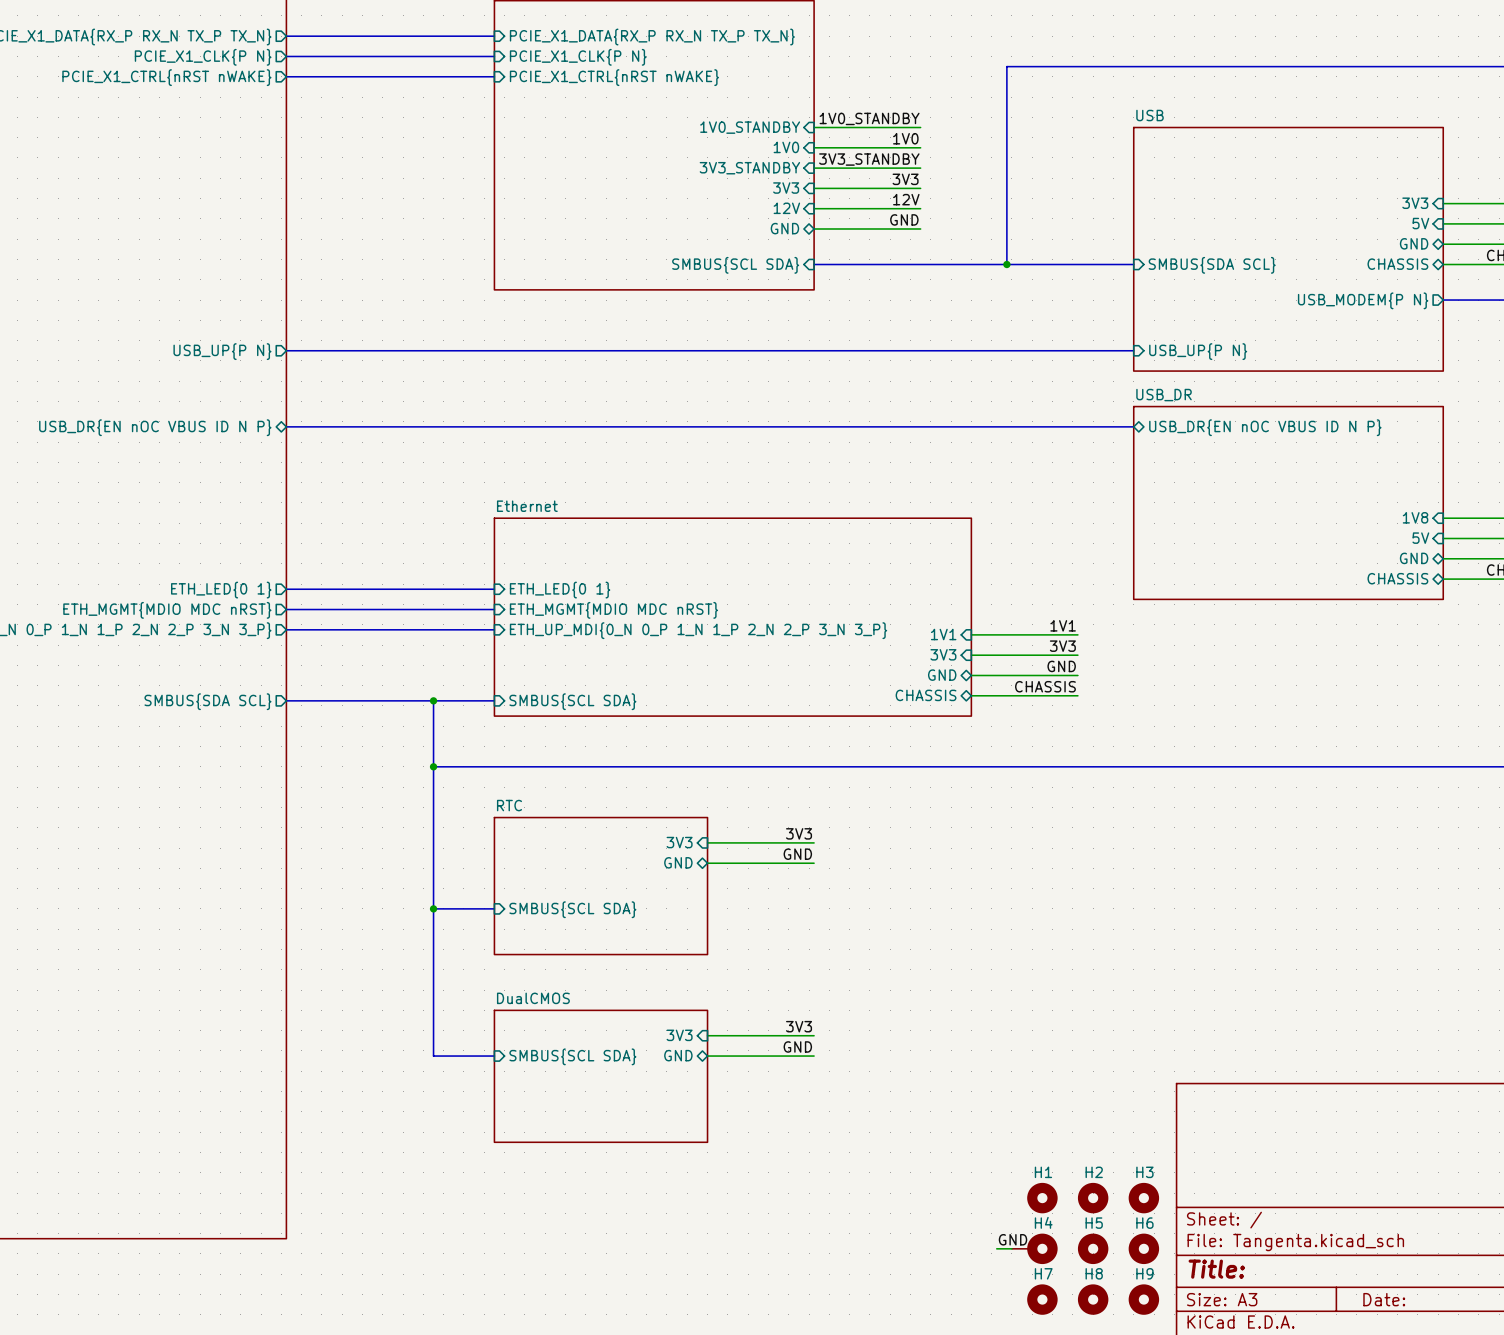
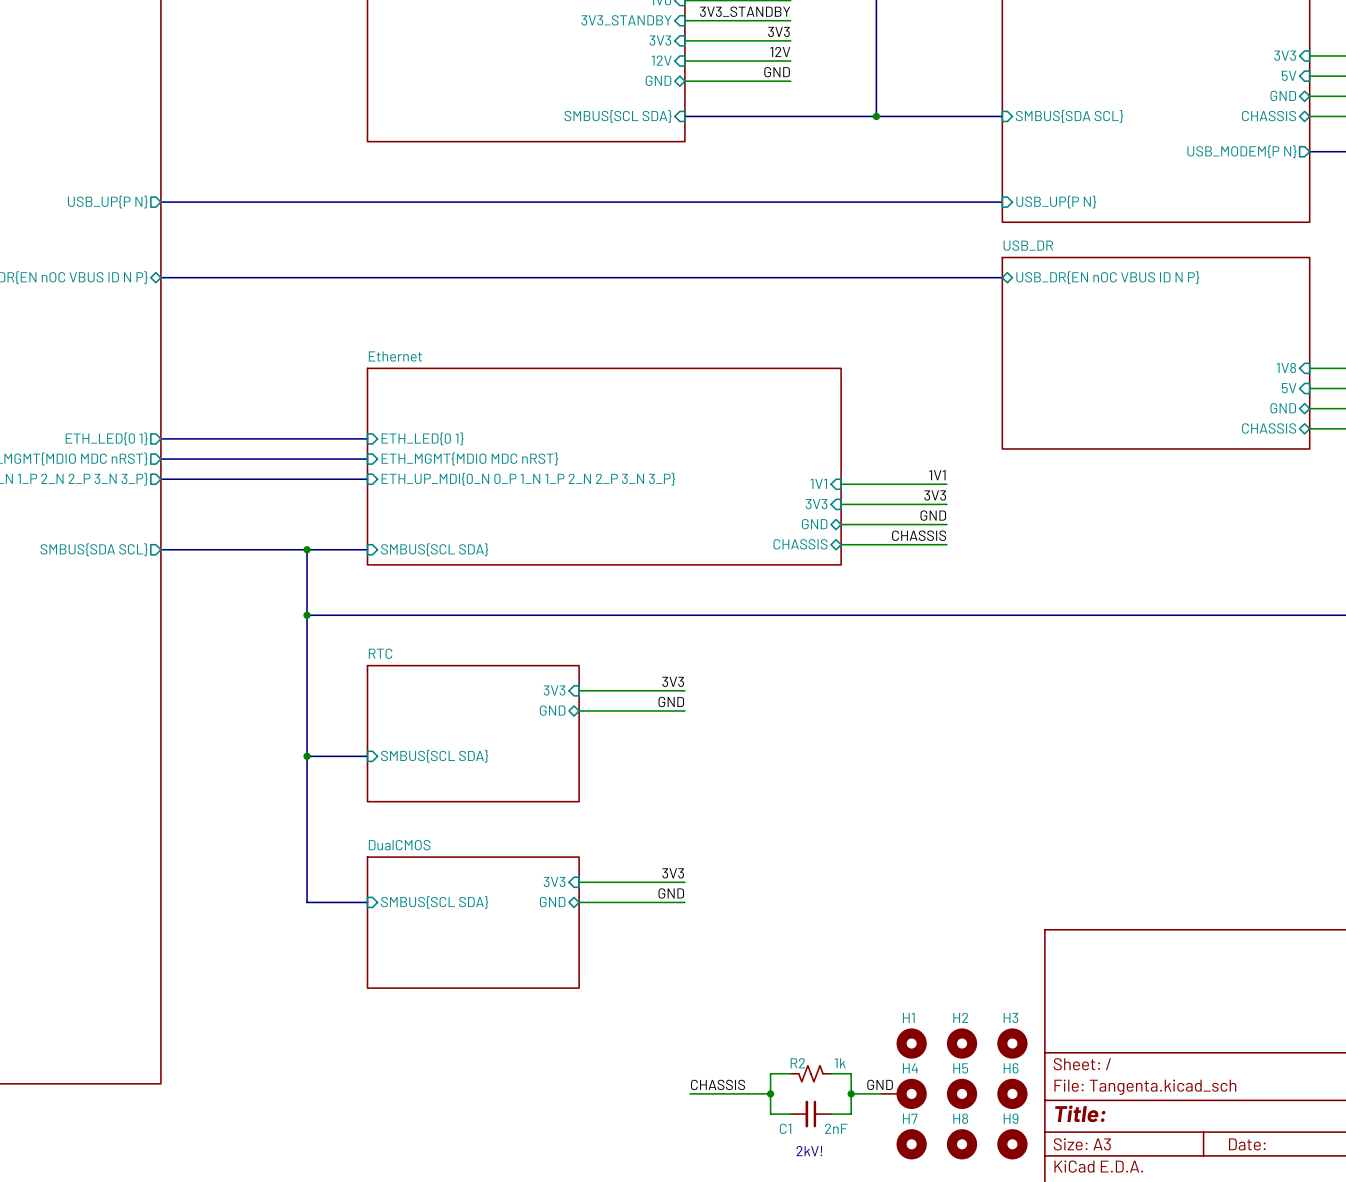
wire: none -> (790, 1073) (770, 1073) (770, 1114) (790, 1114)
R2: none -> 1k (810, 1073)
wire: none -> (831, 1073) (851, 1073) (851, 1114) (831, 1114)
label: none -> CHASSIS (718, 1084)
wire: none -> (689, 1093) (770, 1093)
junction: none -> (770, 1093)
wire: none -> (851, 1093) (866, 1093)
junction: none -> (851, 1093)
C1: none -> 2nF (810, 1114)
text: none -> 2kV! (809, 1151)

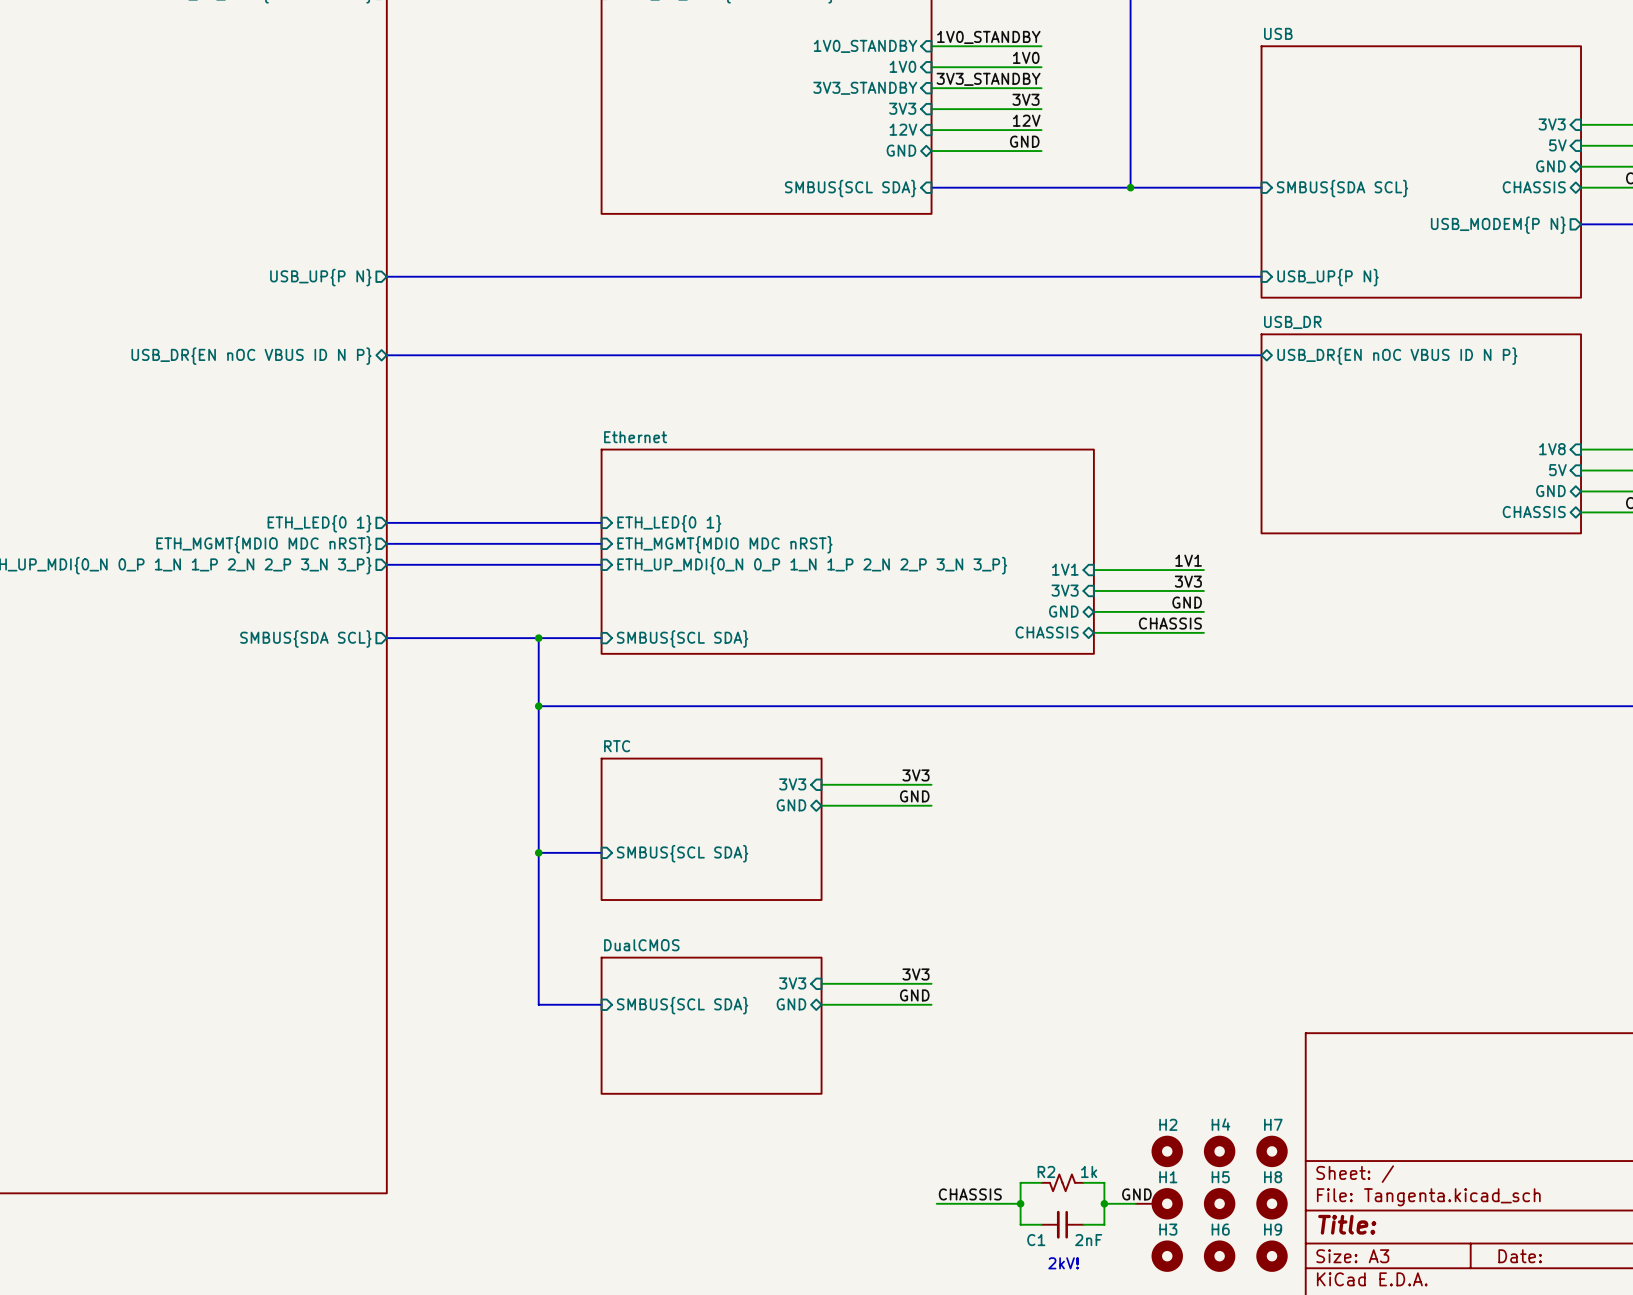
H1 name: H1 (908, 1017) -> H2 (1168, 1124)
H2 name: H2 (960, 1017) -> H4 (1220, 1124)
H3 name: H3 (1010, 1018) -> H7 (1273, 1124)
H4 name: H4 (910, 1068) -> H1 (1168, 1177)
H6 name: H6 (1011, 1068) -> H8 (1273, 1177)
H7 name: H7 (910, 1118) -> H3 (1168, 1229)
H8 name: H8 (960, 1118) -> H6 (1220, 1229)

